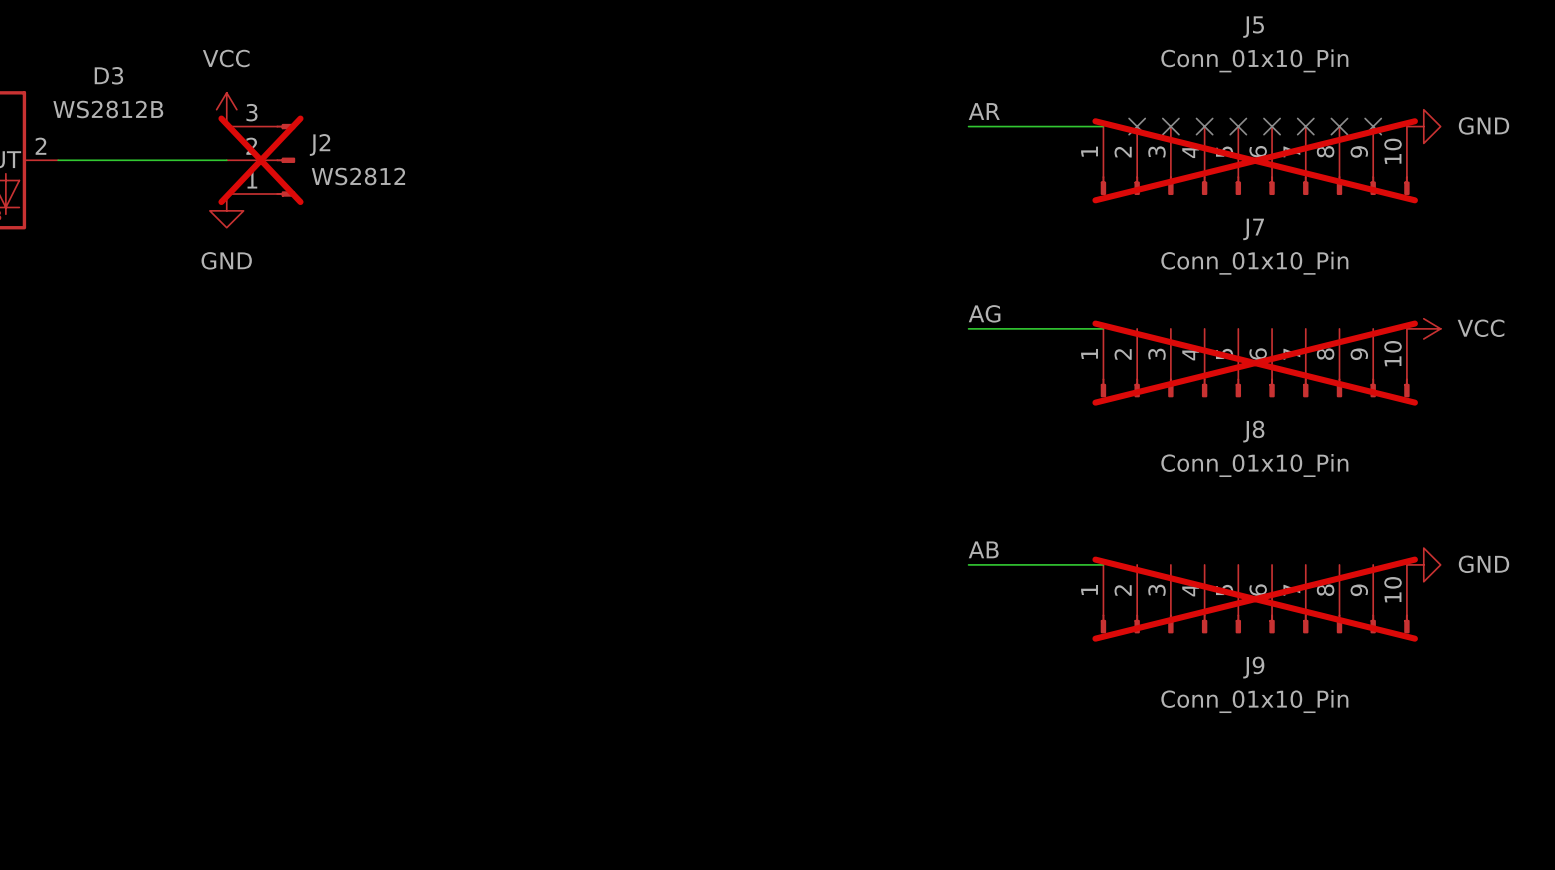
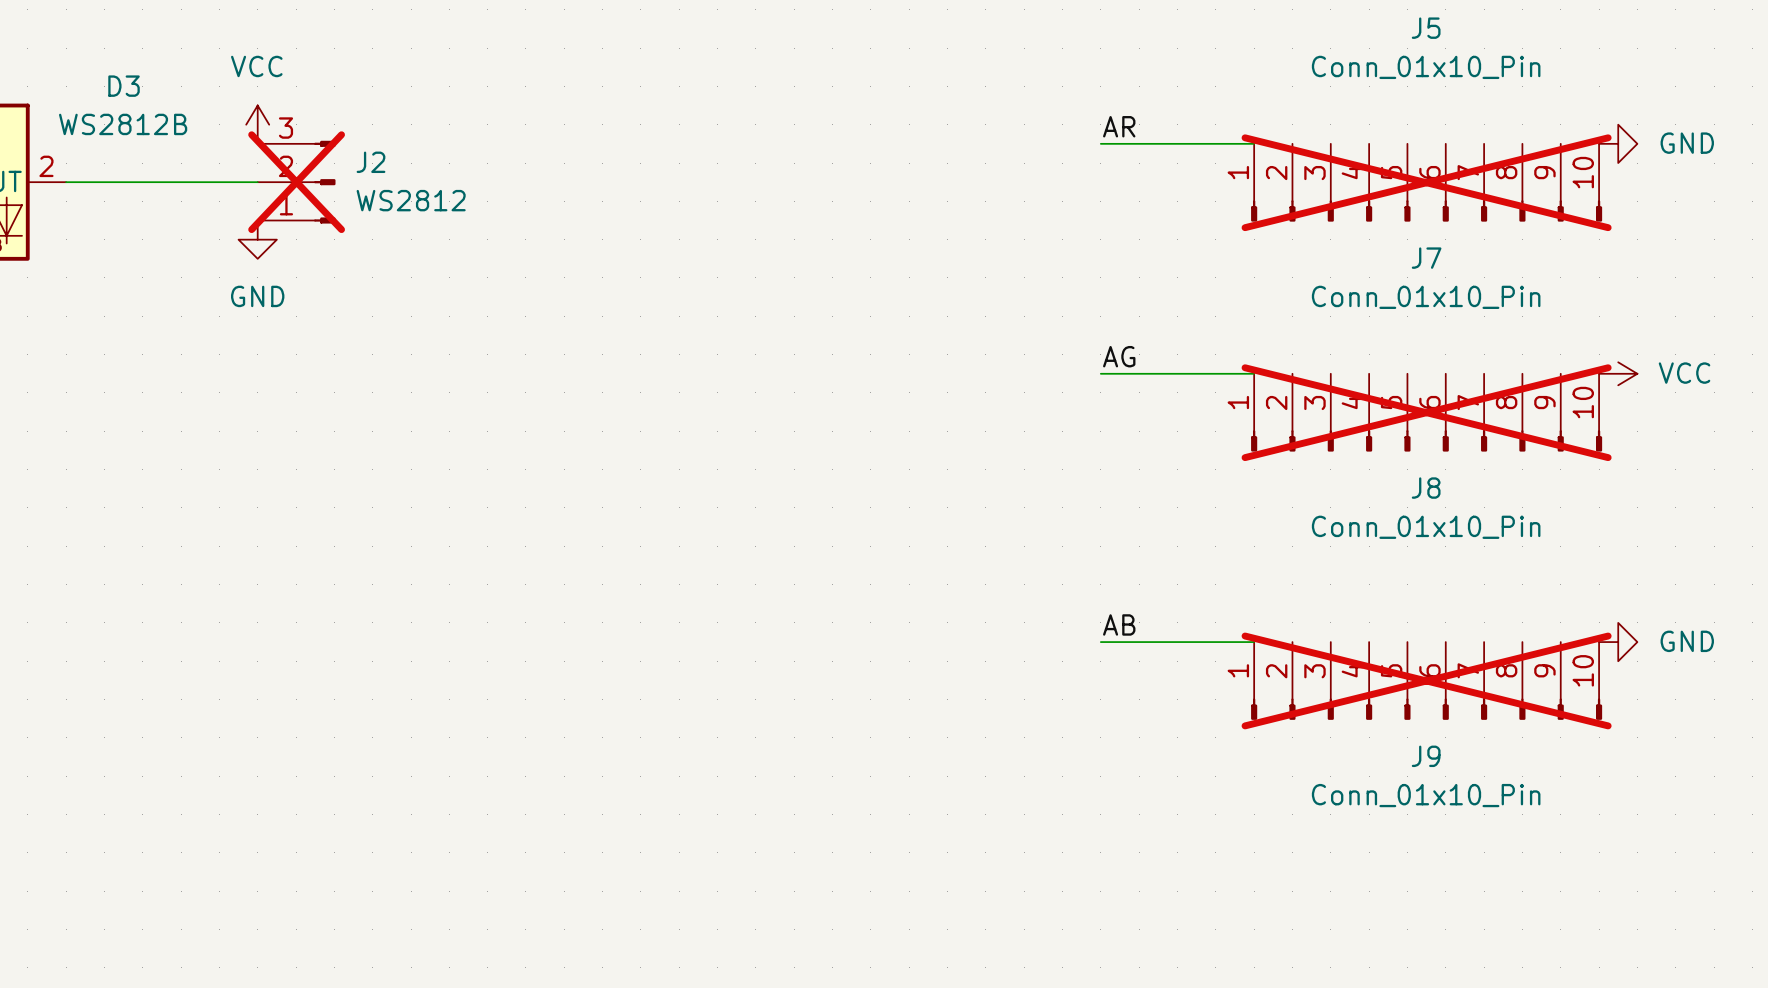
no-connect mark: (1137, 126) -> none
no-connect mark: (1170, 126) -> none
no-connect mark: (1204, 126) -> none
no-connect mark: (1238, 126) -> none
no-connect mark: (1272, 126) -> none
no-connect mark: (1305, 126) -> none
no-connect mark: (1339, 126) -> none
no-connect mark: (1373, 126) -> none

